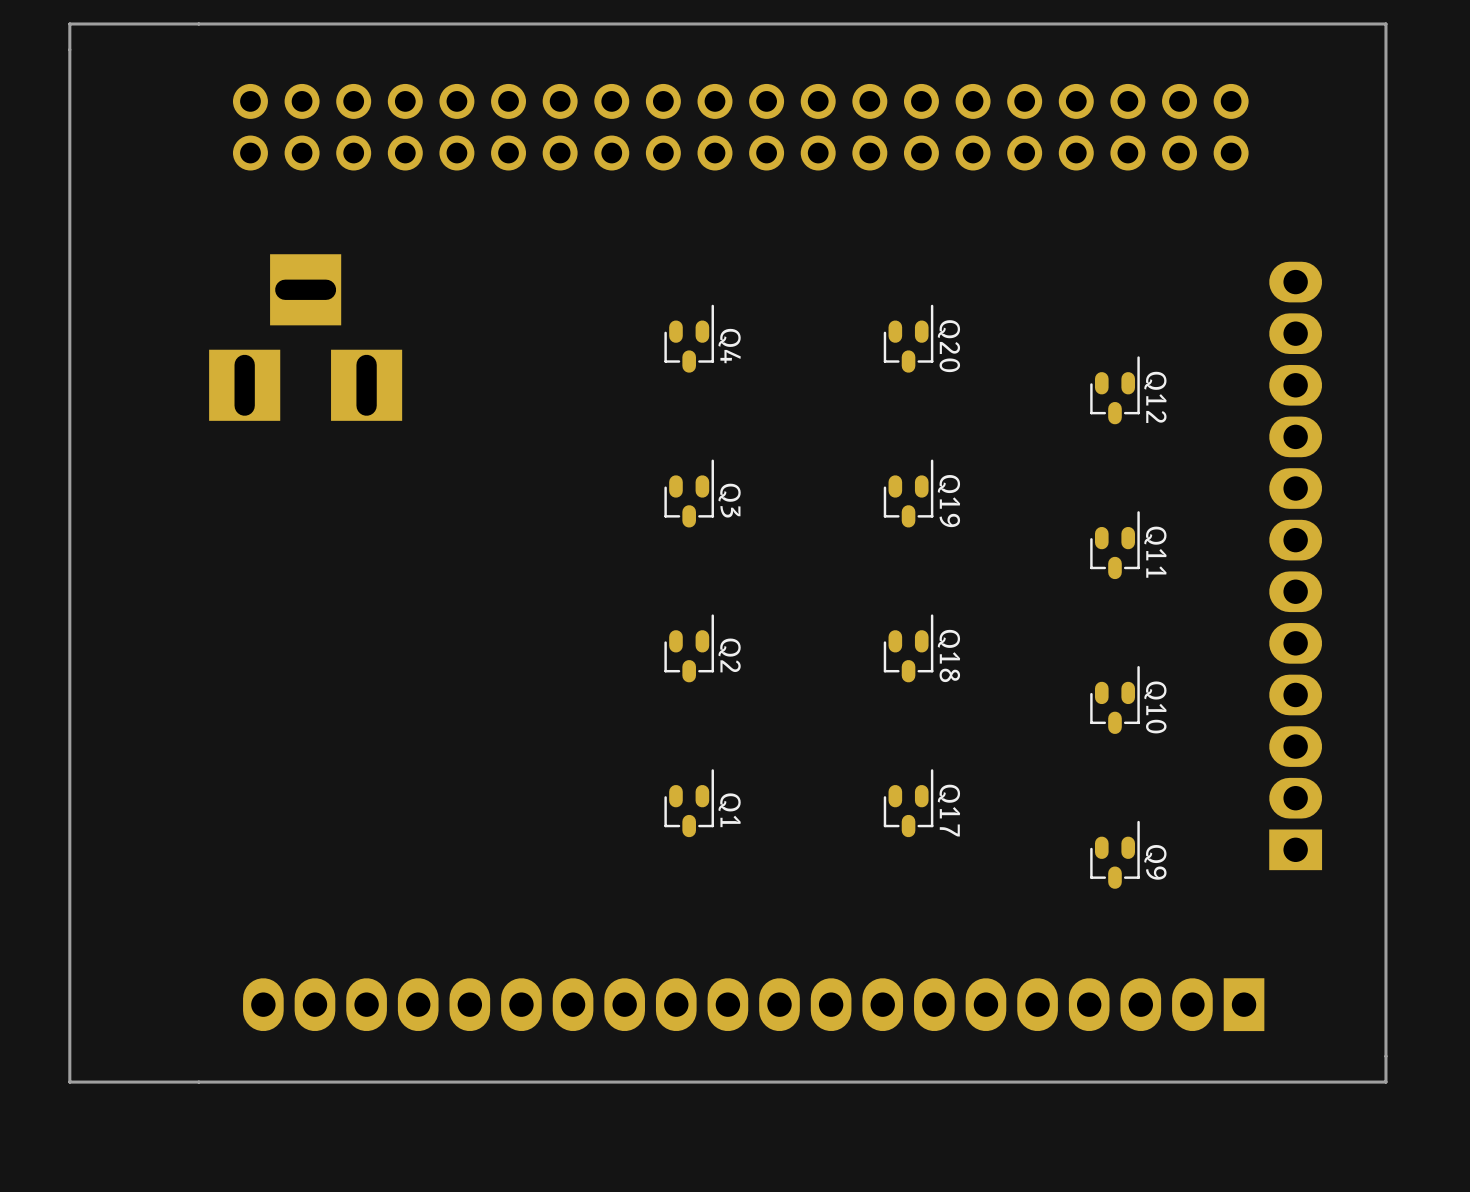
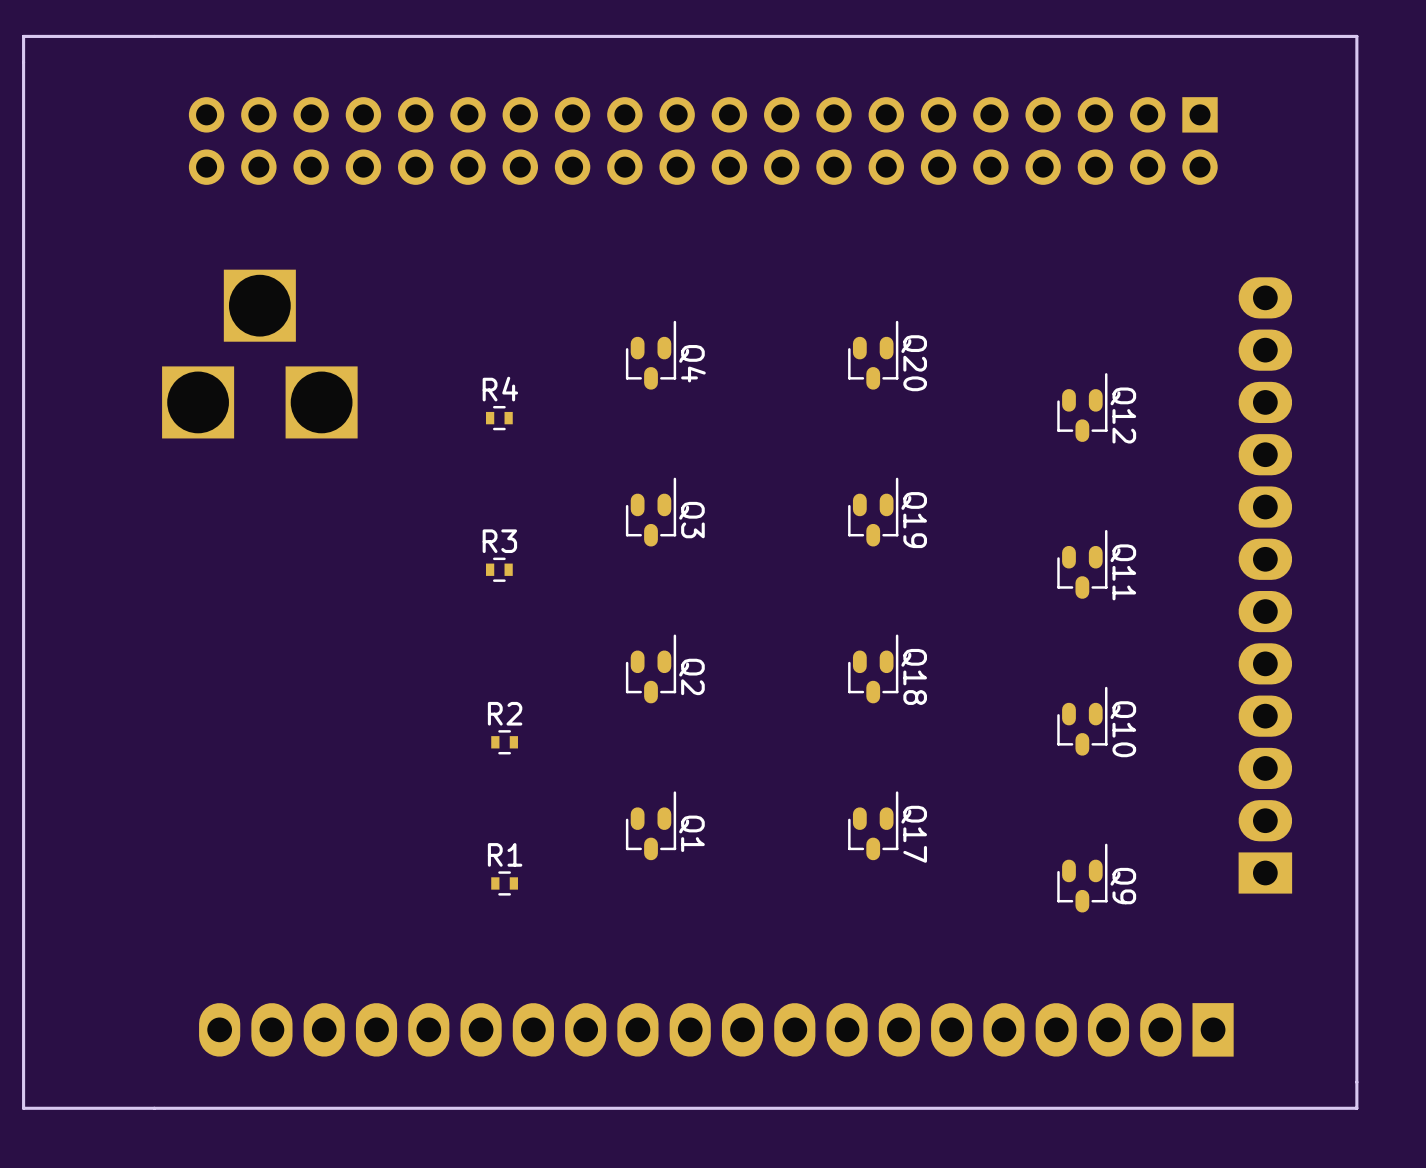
part footprint: [232, 83, 1249, 171] -> [188, 97, 1218, 185]
part footprint: [209, 254, 403, 421] -> [162, 269, 358, 439]
R4: none -> (499, 418)
R3: none -> (499, 569)
R2: none -> (504, 742)
R1: none -> (504, 883)

